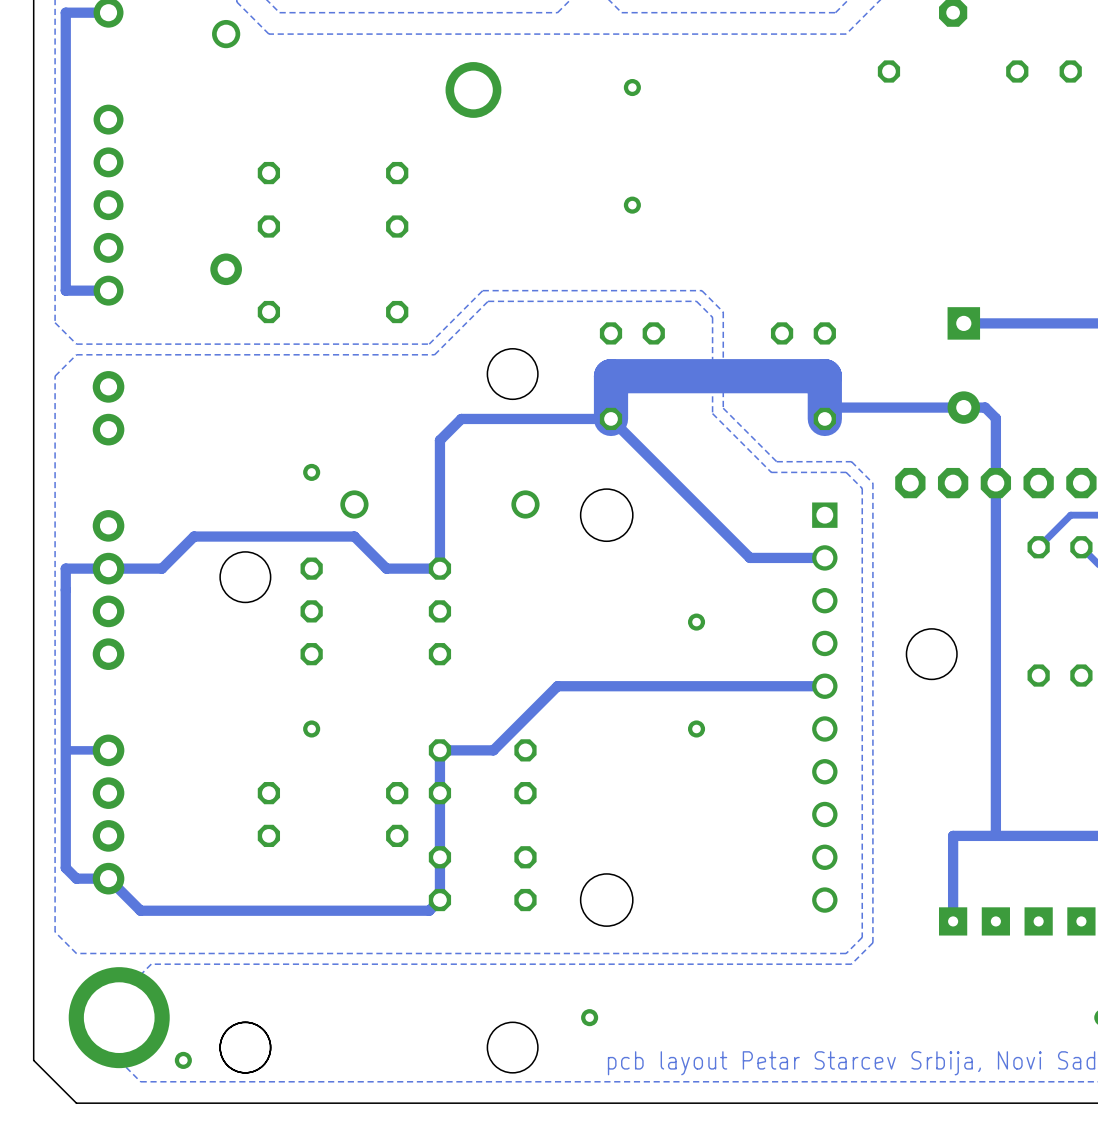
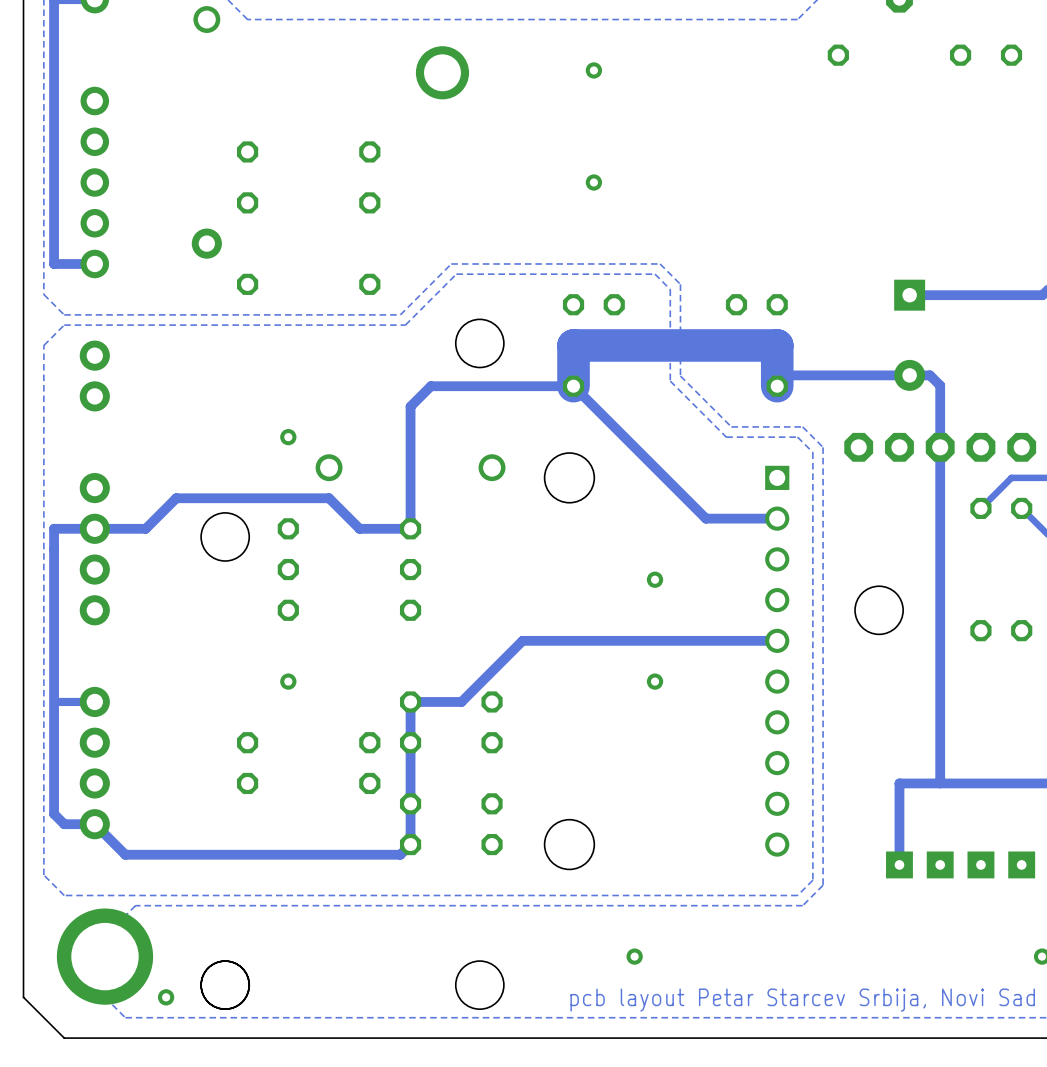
via position: (589, 1017) -> (634, 956)

